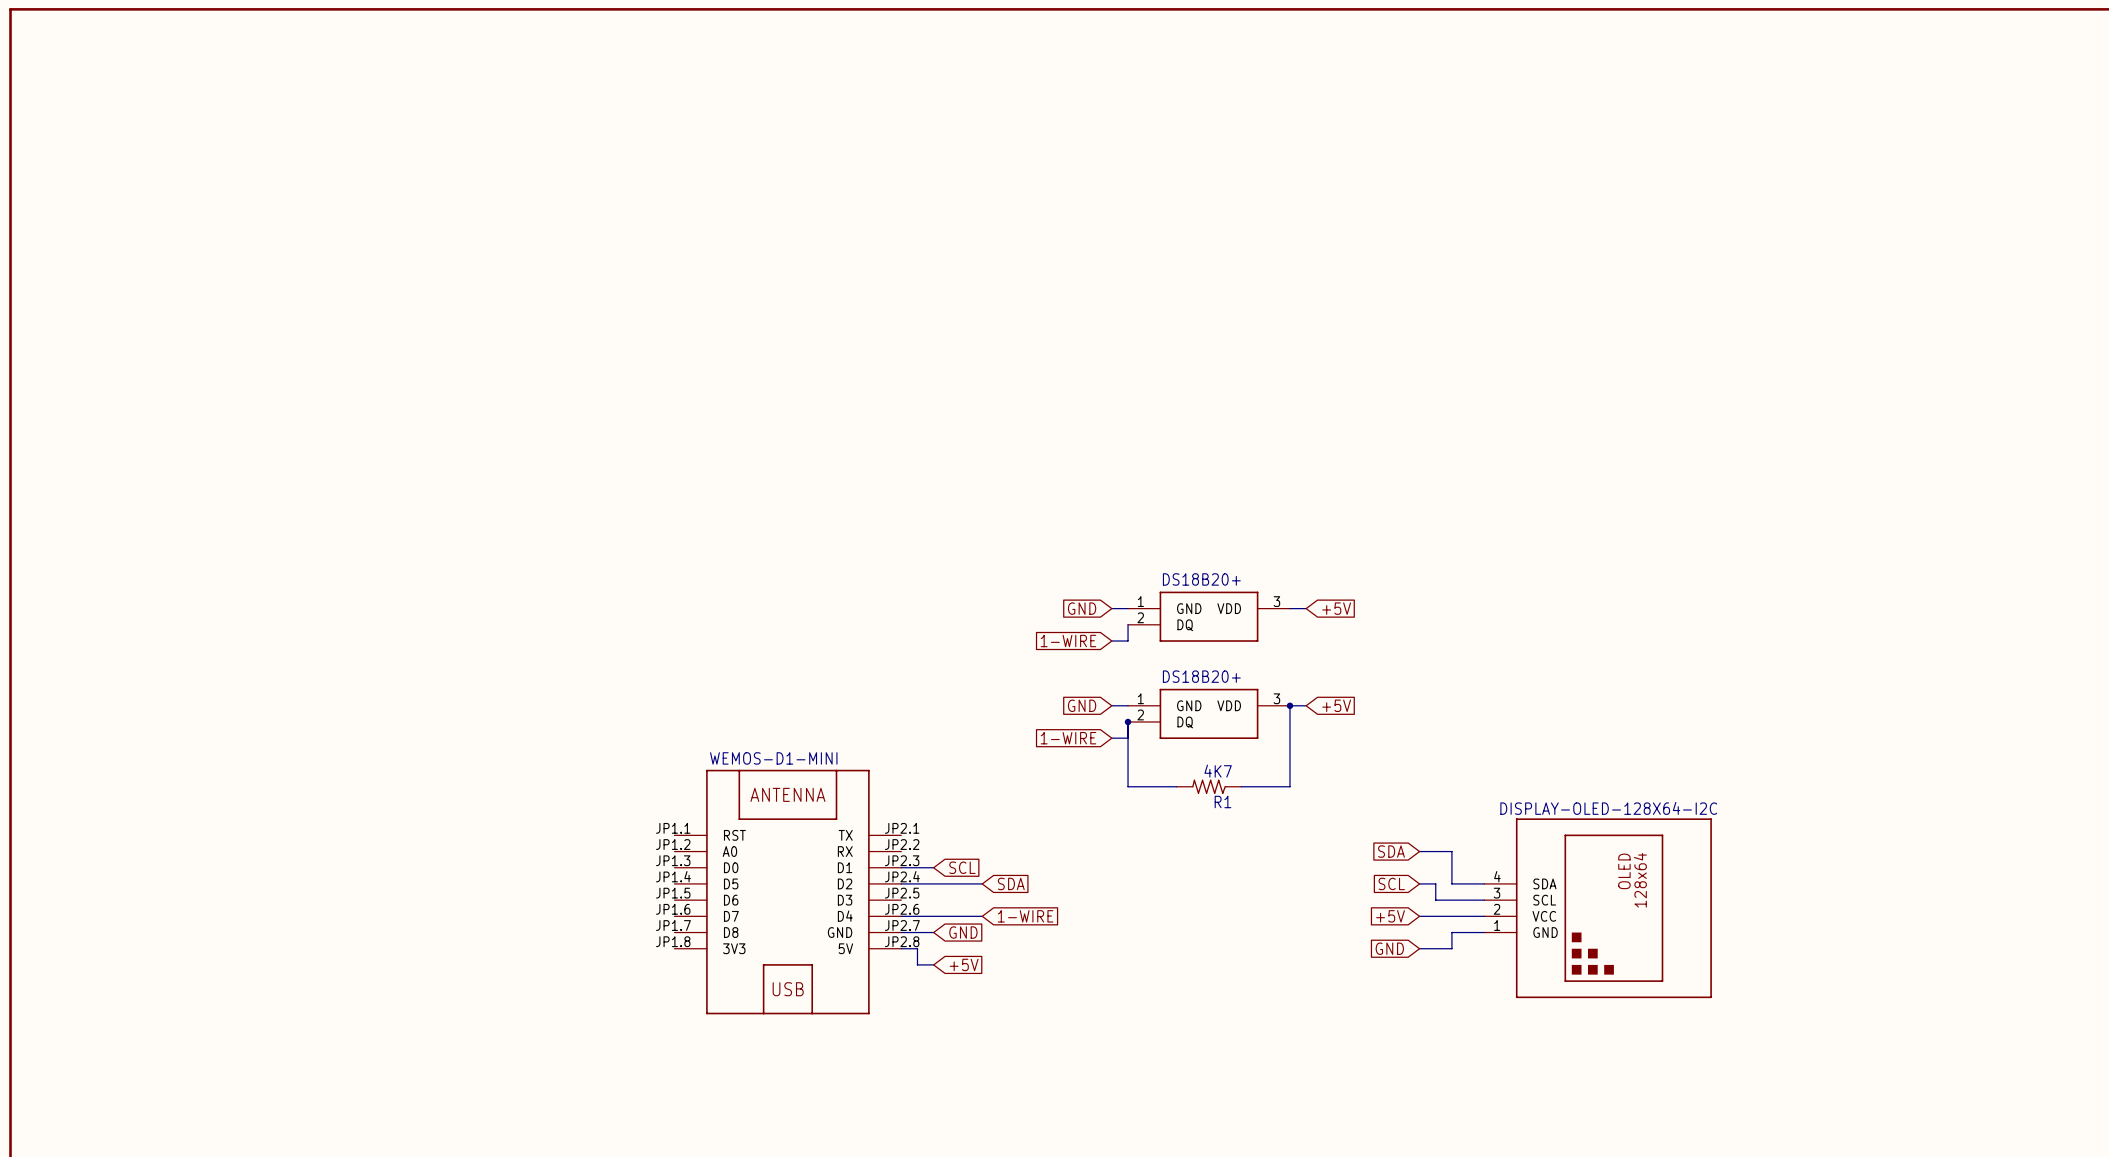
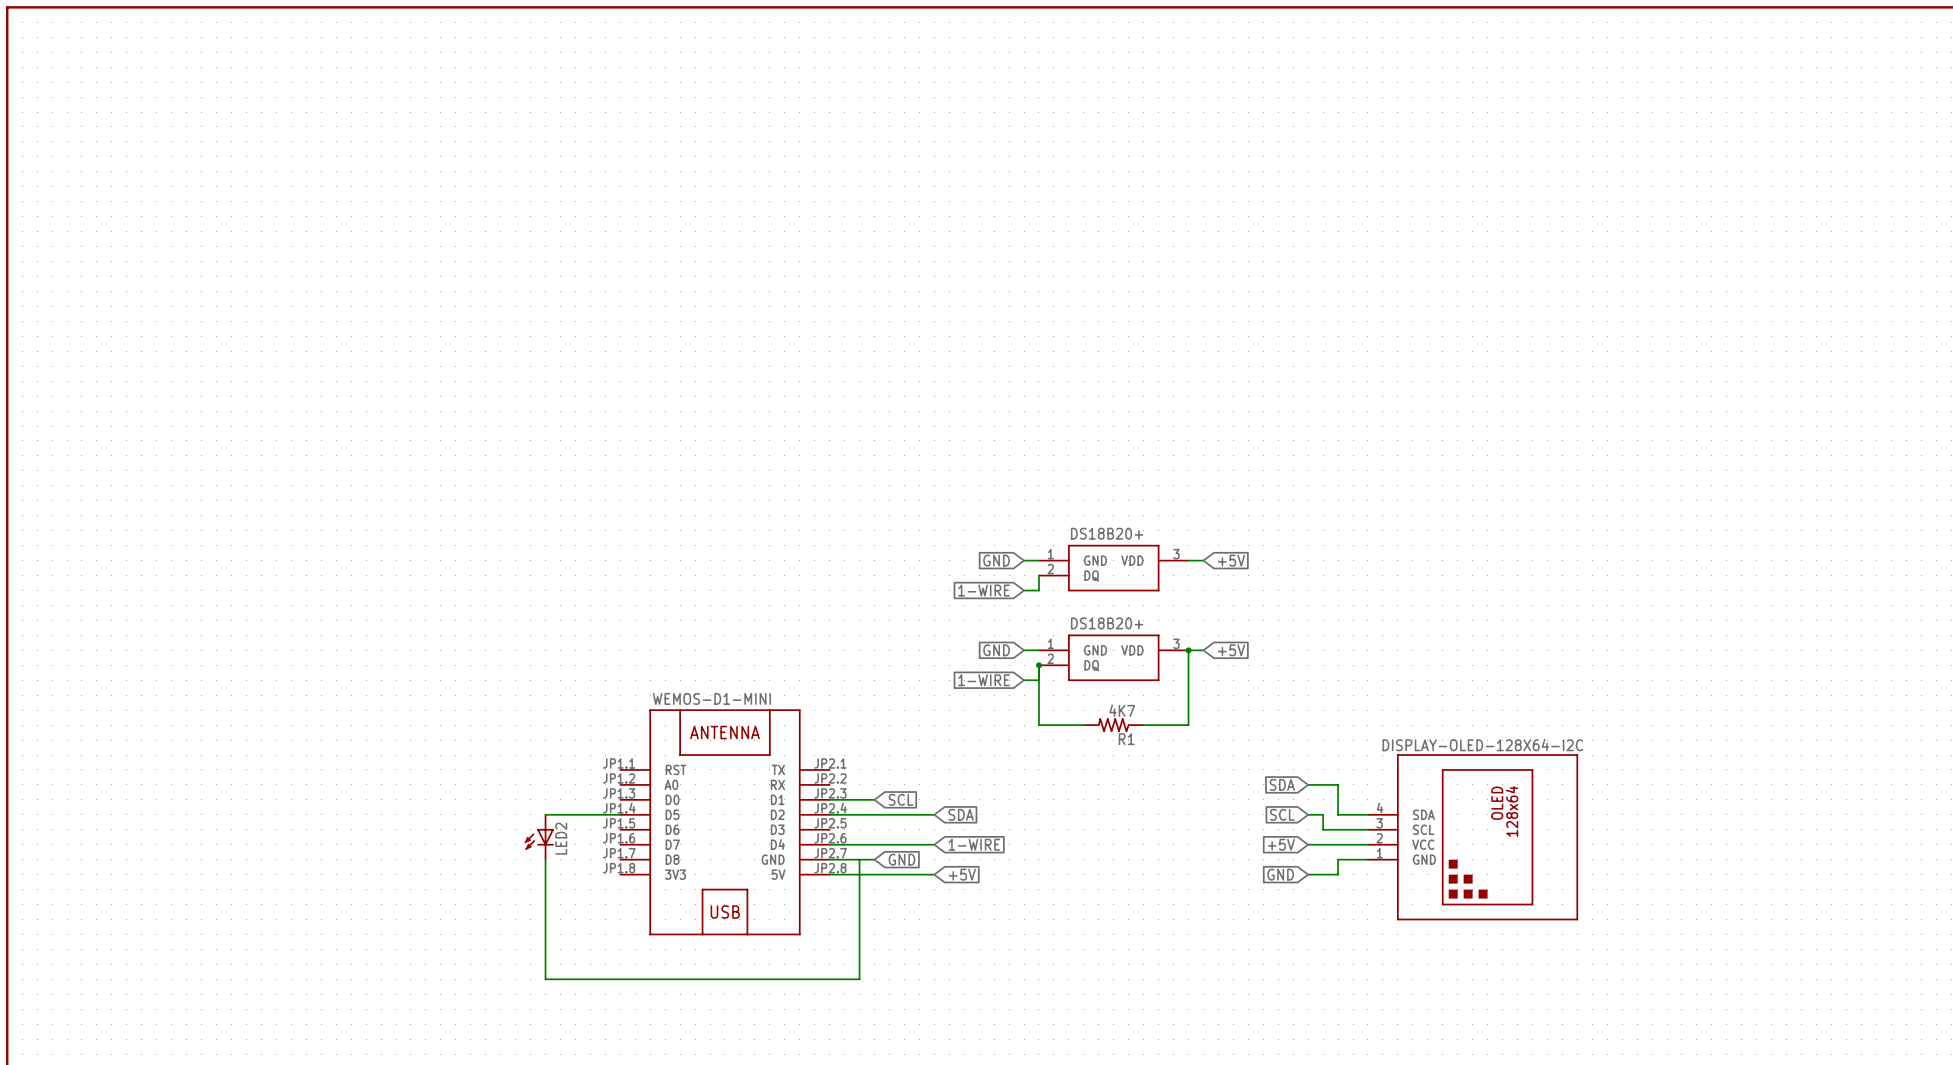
wire: none -> (859, 799) (874, 799)
global label position: SCL (962, 867) -> SCL (901, 799)
wire: none -> (545, 814) (620, 814)
wire: none -> (904, 814) (934, 814)
global label position: SDA (1011, 883) -> SDA (961, 814)
LED2: none -> (539, 837)
wire: none -> (904, 844) (934, 844)
global label position: 1-WIRE (1025, 916) -> 1-WIRE (974, 844)
wire: none -> (545, 859) (545, 979) (859, 979) (859, 859) (874, 859)
global label position: GND (963, 932) -> GND (901, 859)
wire: (917, 948) (917, 964) (933, 964) -> (844, 874) (934, 874)
global label position: +5V (964, 964) -> +5V (962, 874)

